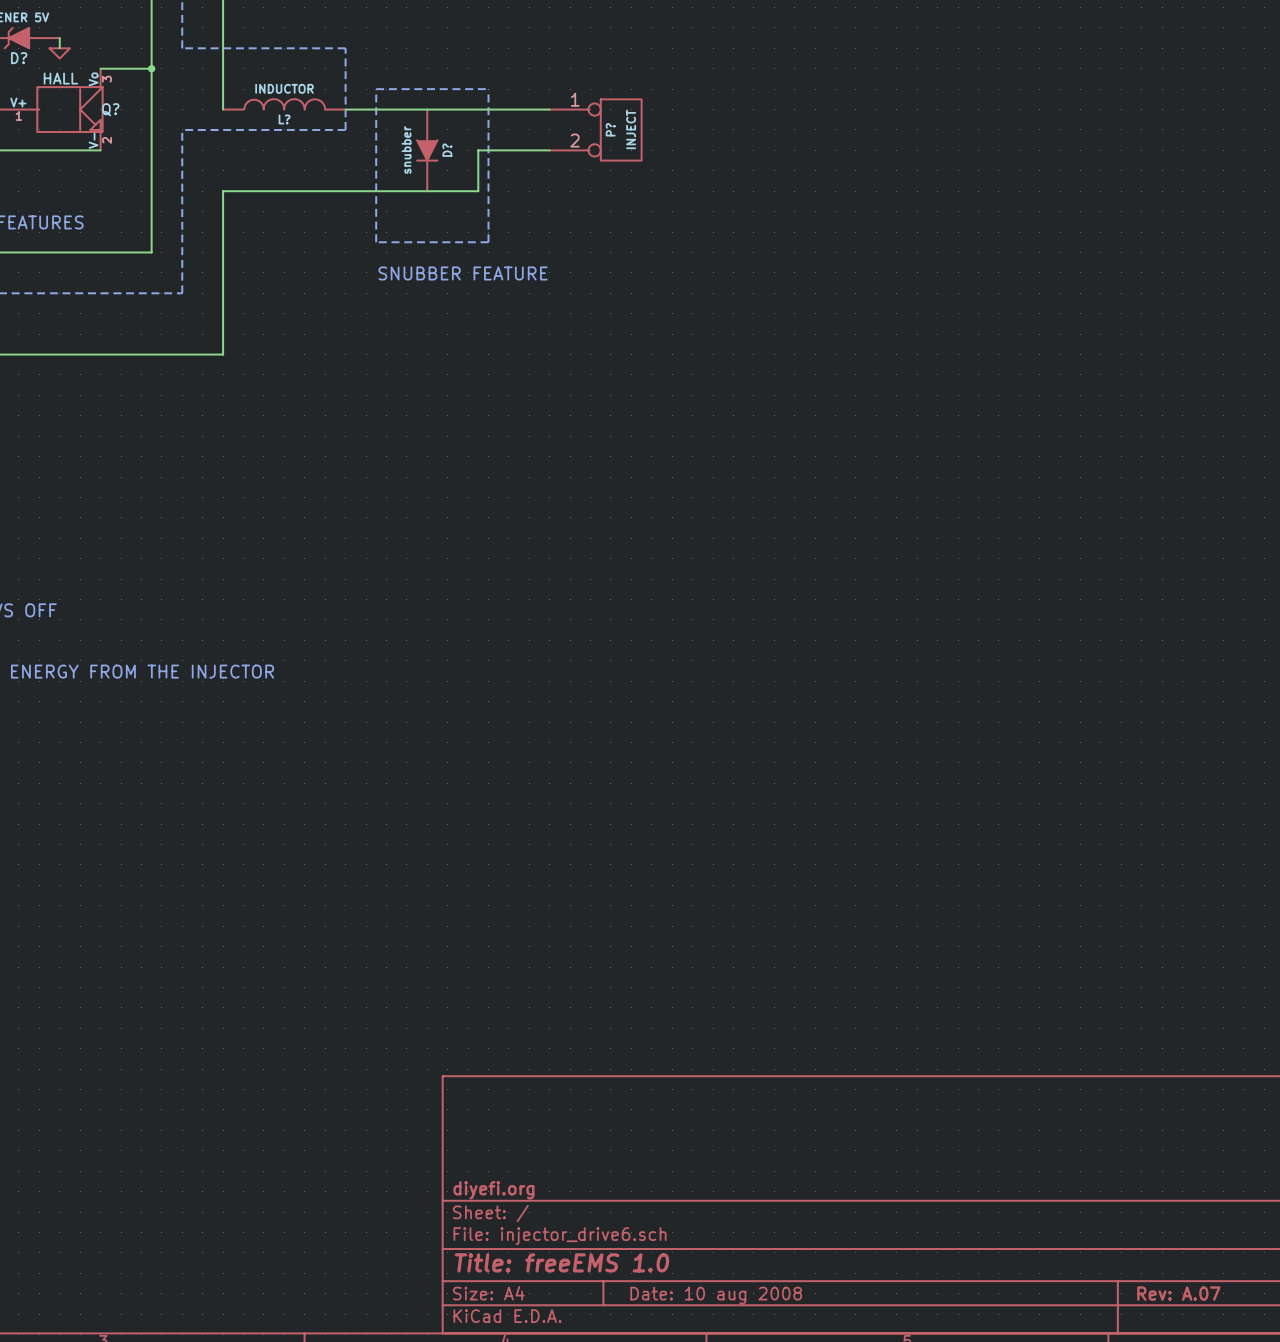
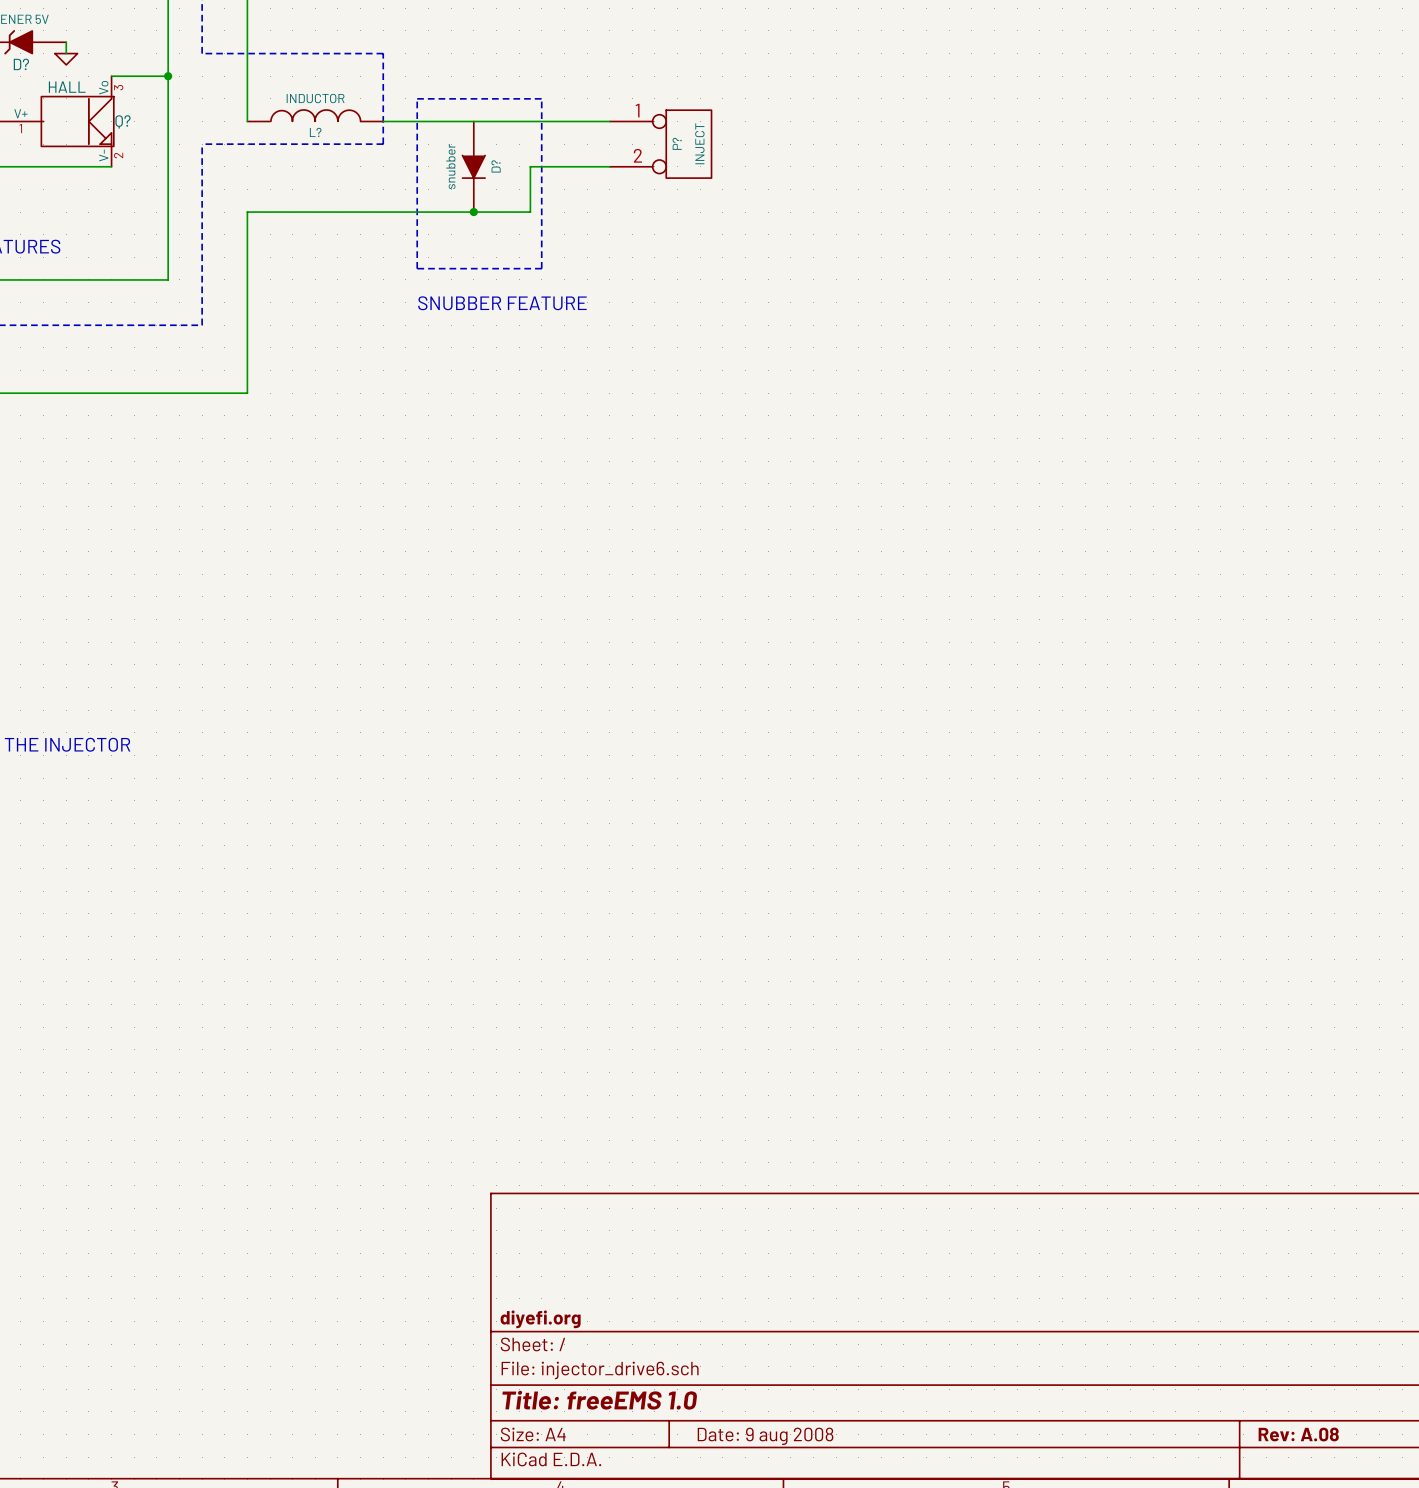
junction: none -> (473, 212)
title block: Rev: A.07 (1178, 1293) -> Rev: A.08 (1298, 1434)
title block: Date: 10 aug 2008 (716, 1295) -> Date: 9 aug 2008 (765, 1436)

